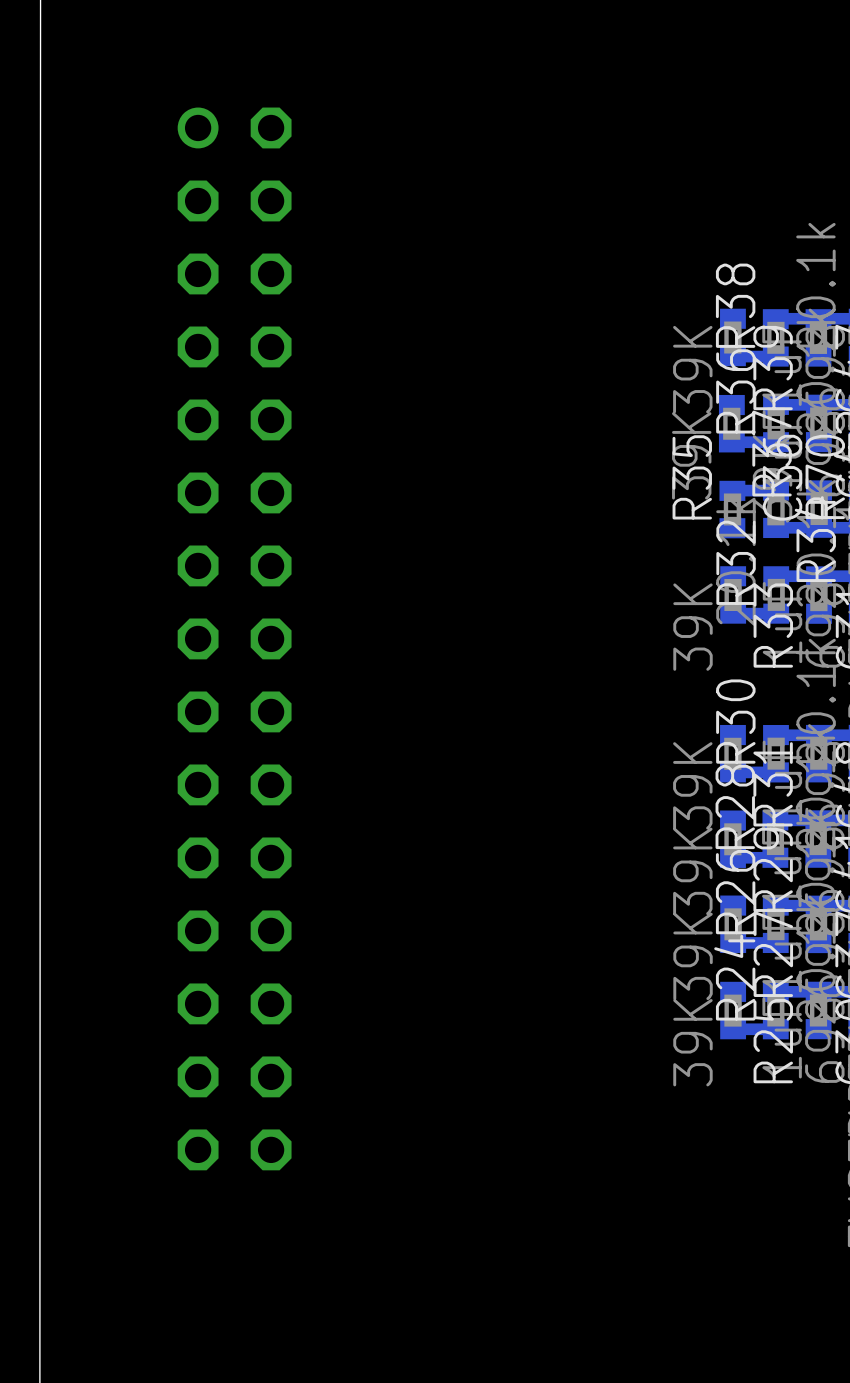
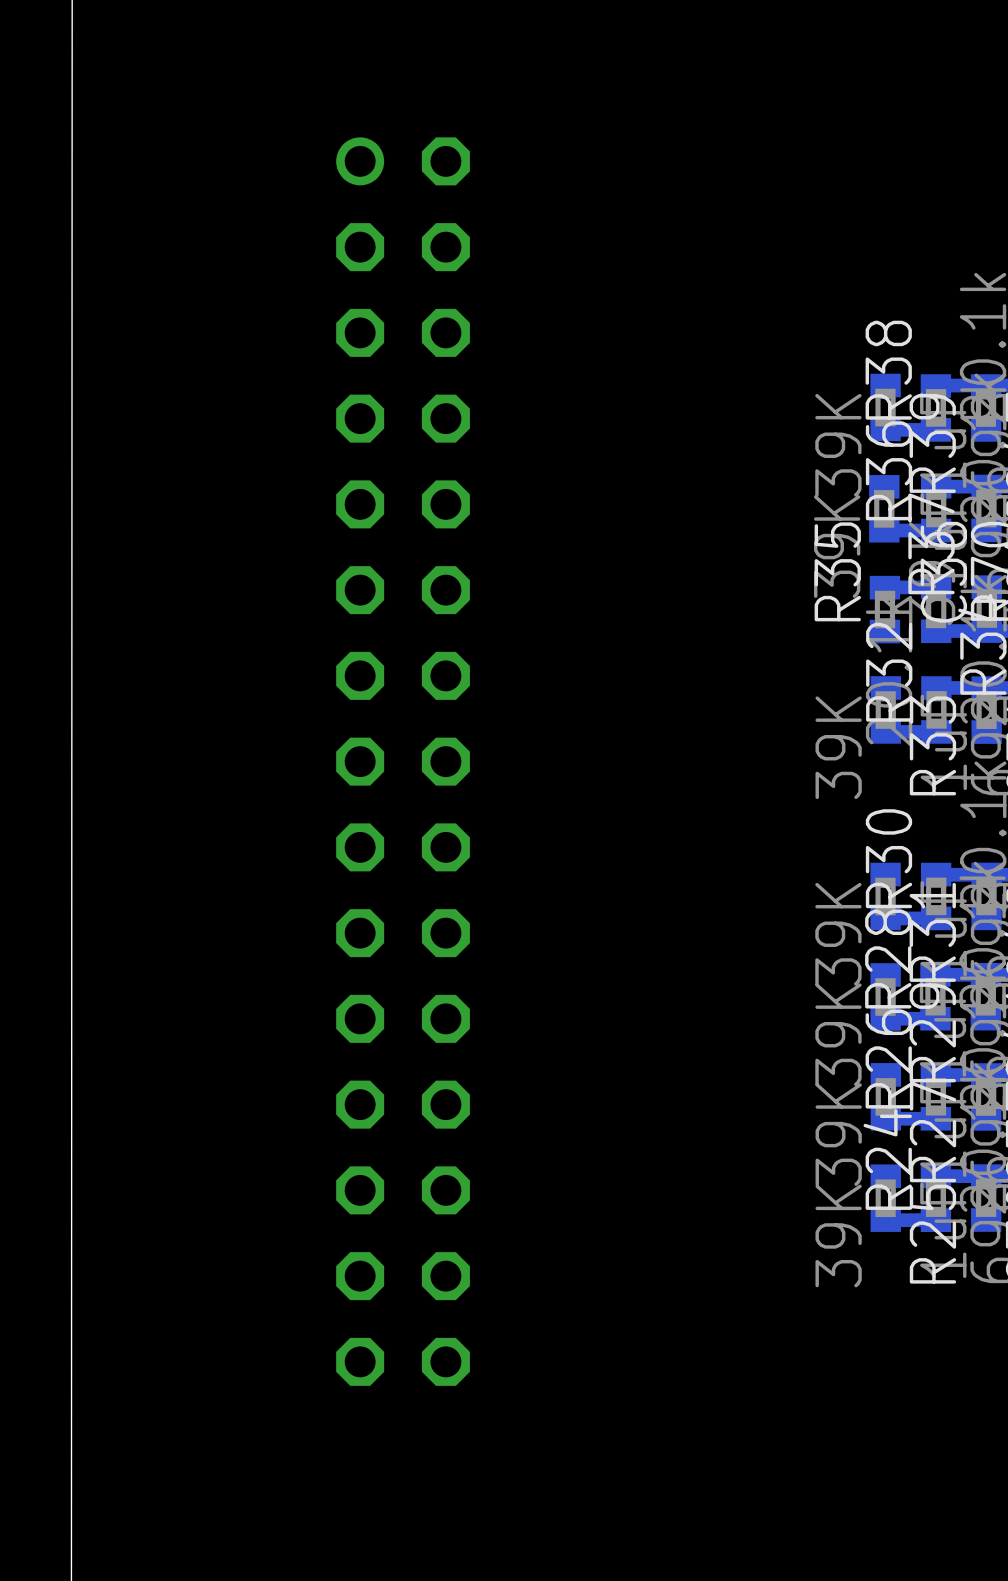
part position: (234, 638) -> (403, 761)

